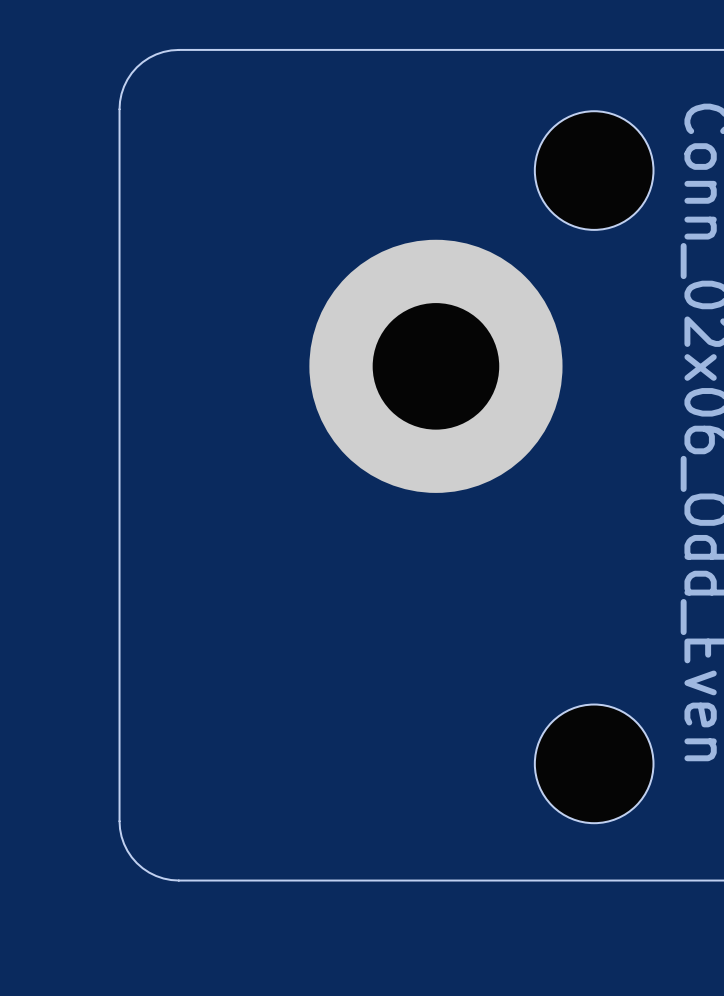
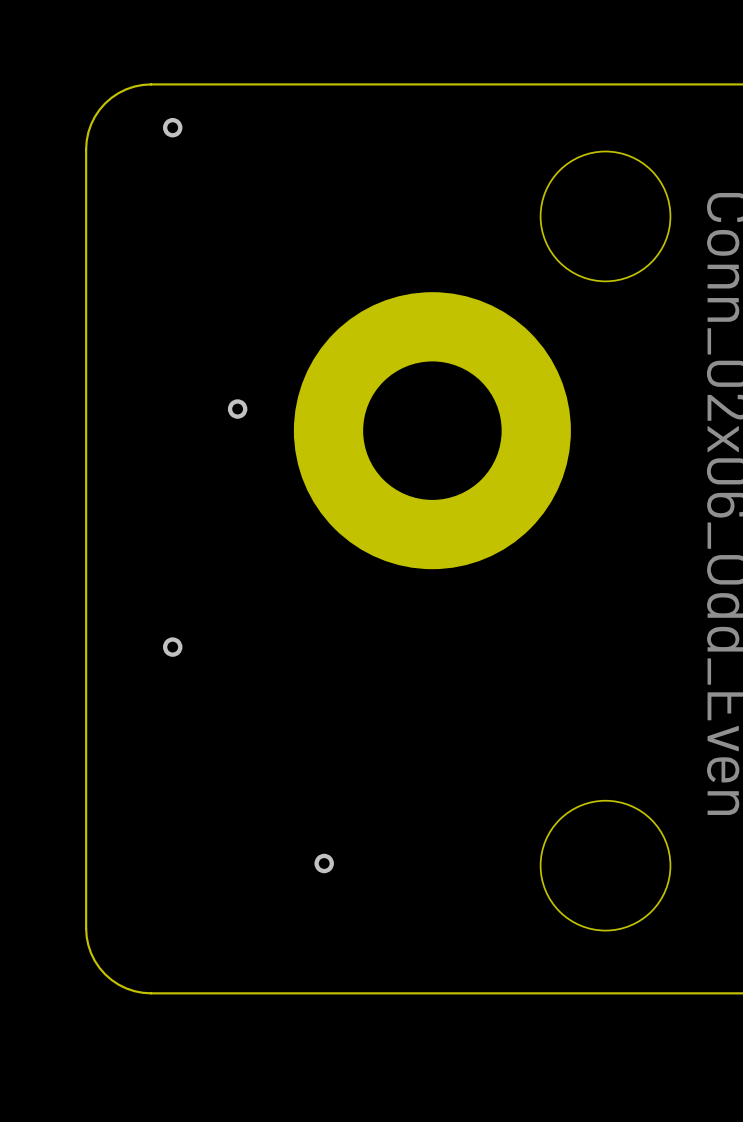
via: none -> (172, 127)
via: none -> (237, 409)
via: none -> (172, 647)
via: none -> (324, 863)

